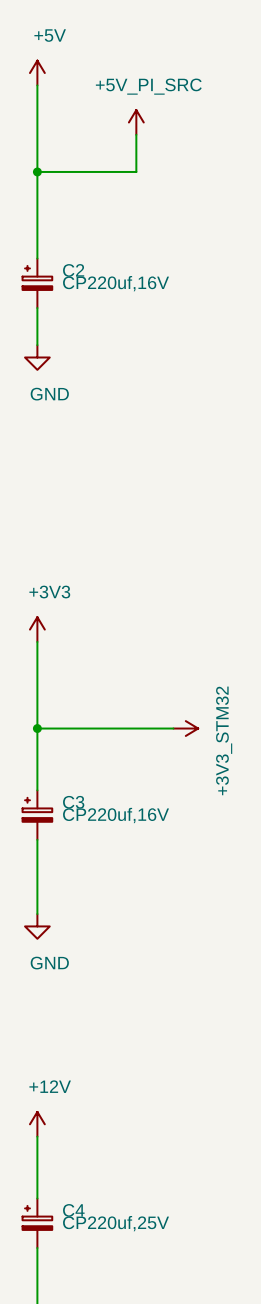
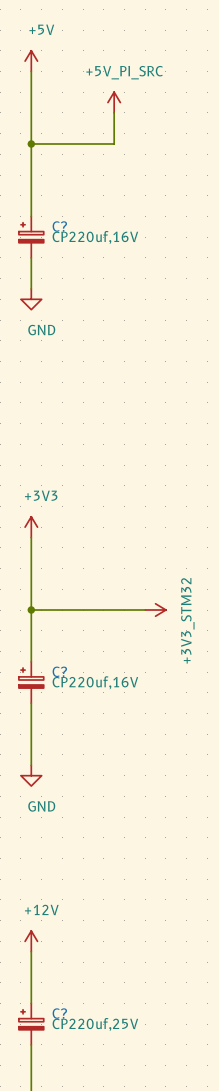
C2 name: C2 (73, 270) -> C? (59, 226)
C3 name: C3 (73, 802) -> C? (59, 671)
C4 name: C4 (73, 1210) -> C? (59, 1013)

